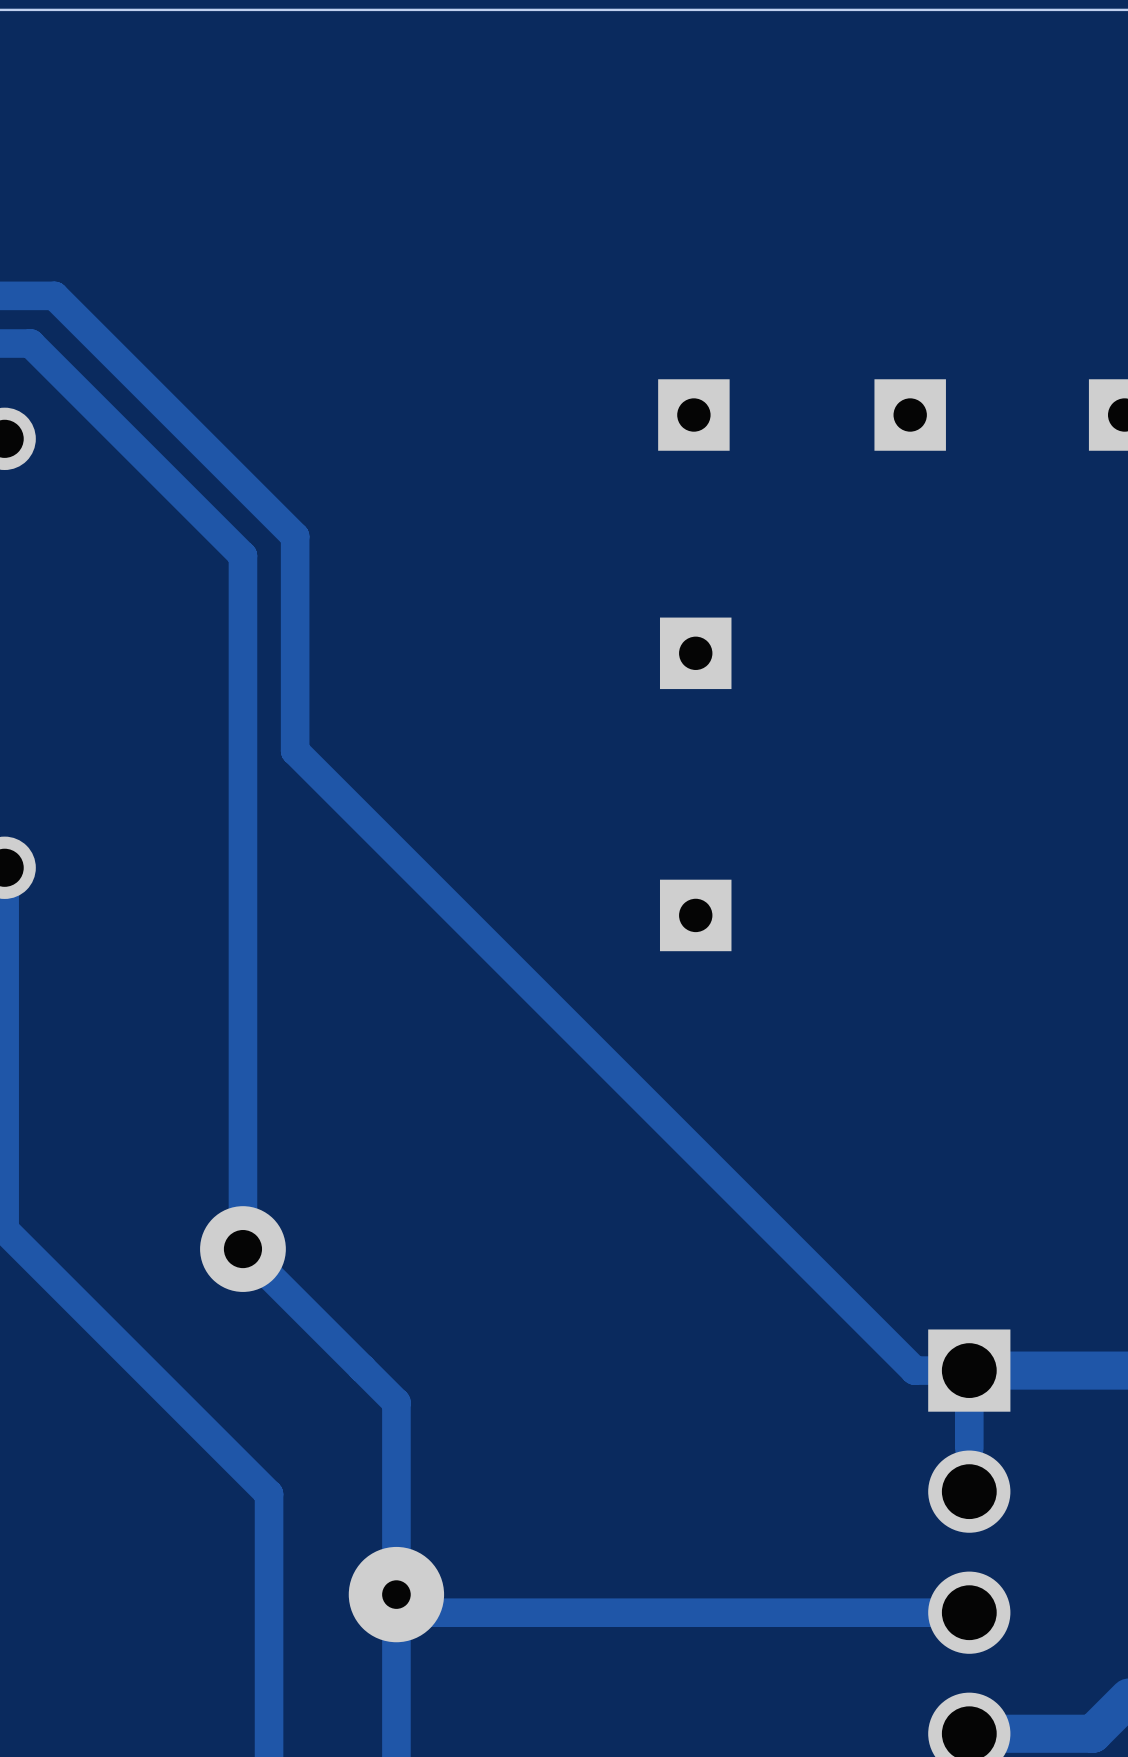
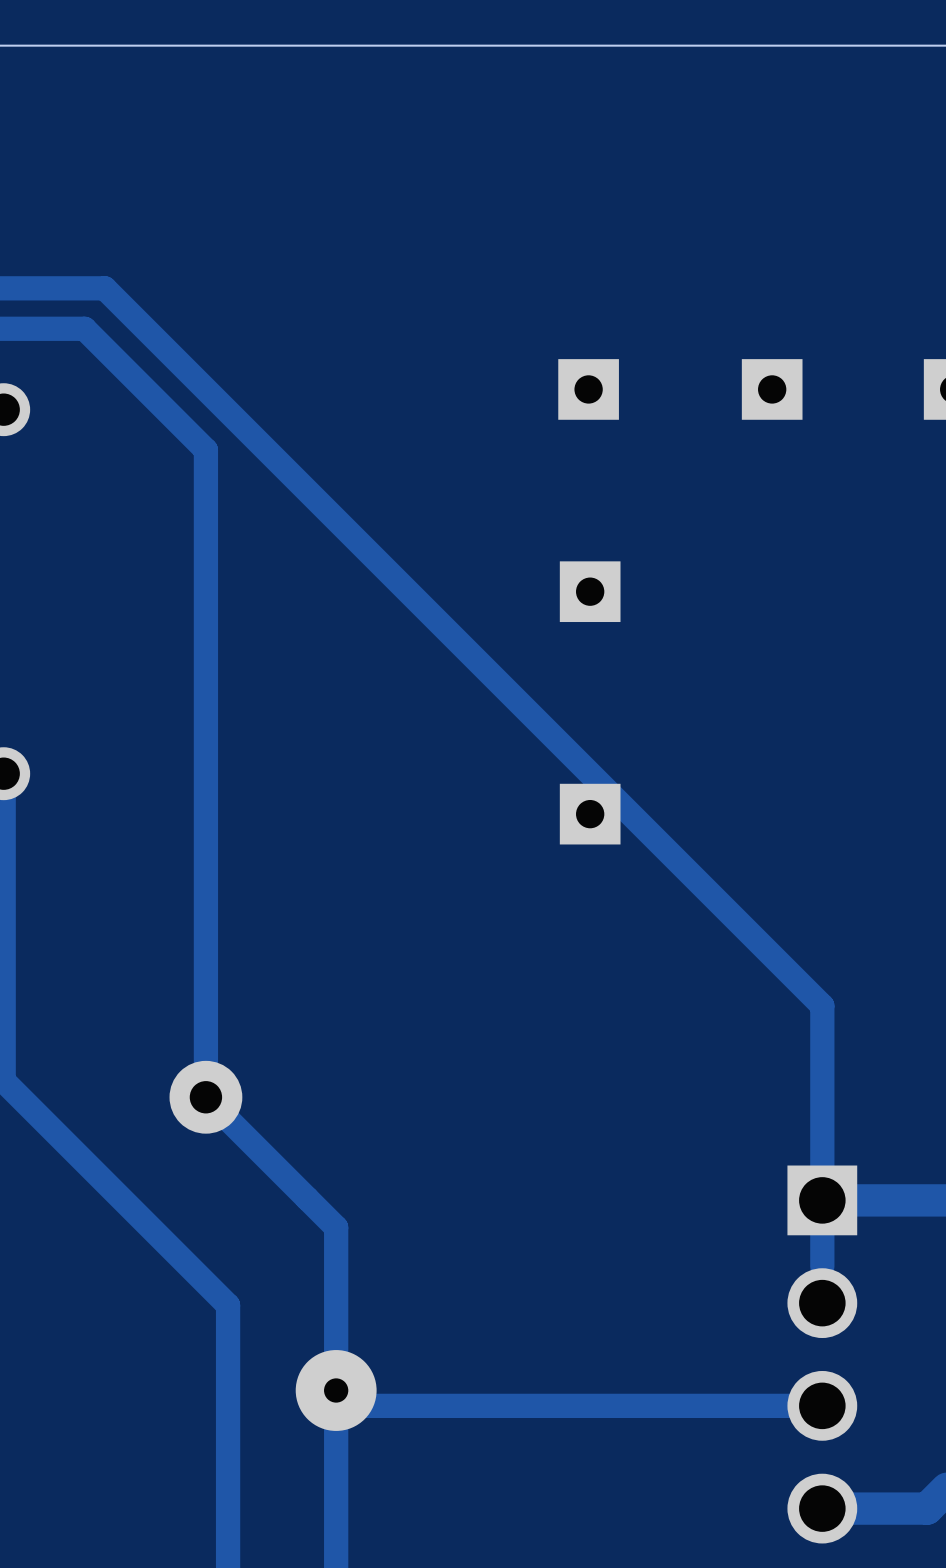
track: (54, 295) (295, 536) (295, 751) (914, 1370) (969, 1370) -> (45, 288) (104, 288) (822, 1005) (822, 1200)
track: (30, 343) (242, 555) -> (25, 328) (84, 328) (205, 450) (205, 508)

